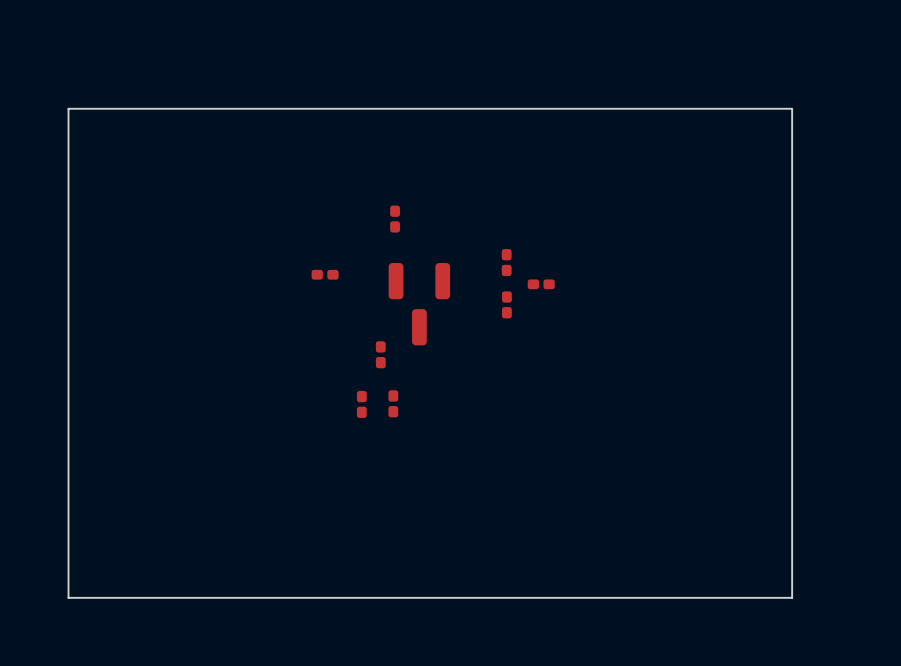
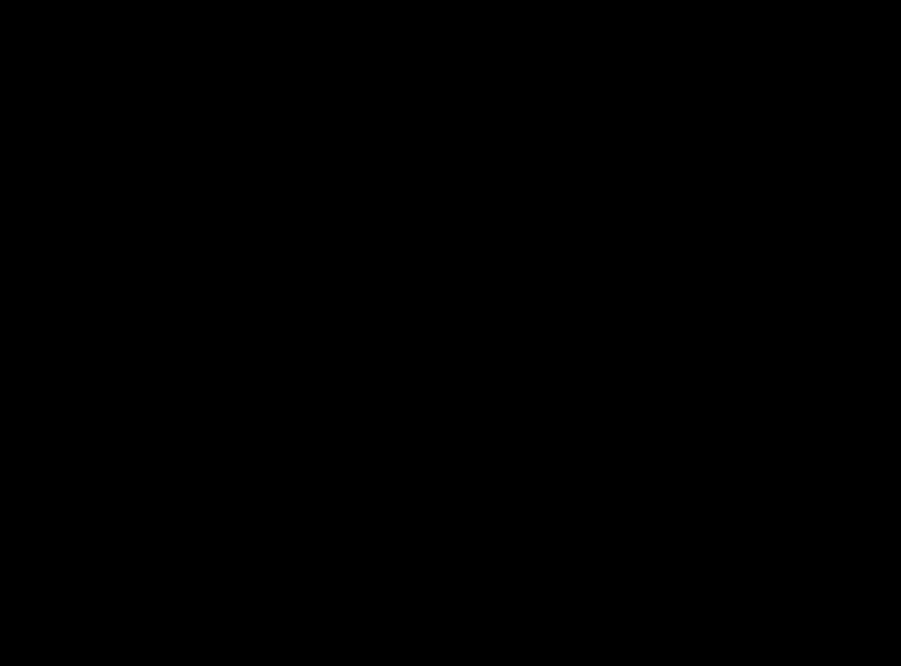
board edge: (792, 108) (68, 108) (68, 597) (792, 597) (792, 108) -> none
part: (395, 219) -> none
part: (506, 262) -> none
part: (325, 274) -> none
part: (541, 284) -> none
part: (419, 304) -> none
part: (506, 304) -> none
part: (380, 354) -> none
part: (393, 403) -> none
part: (361, 404) -> none

